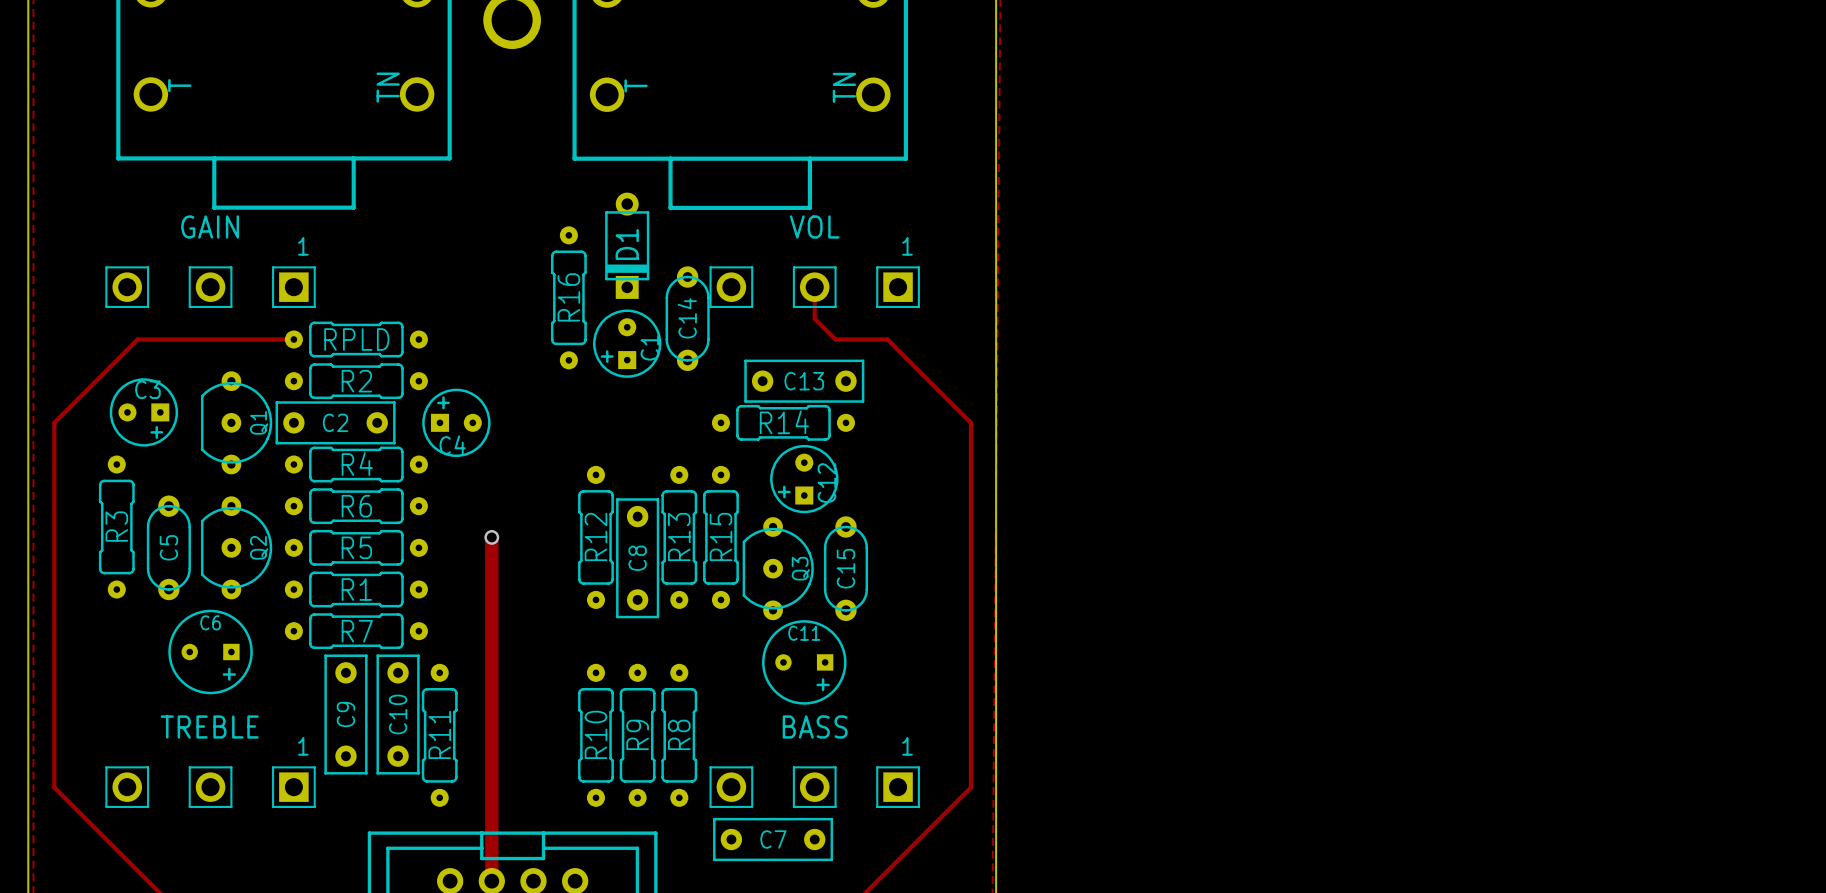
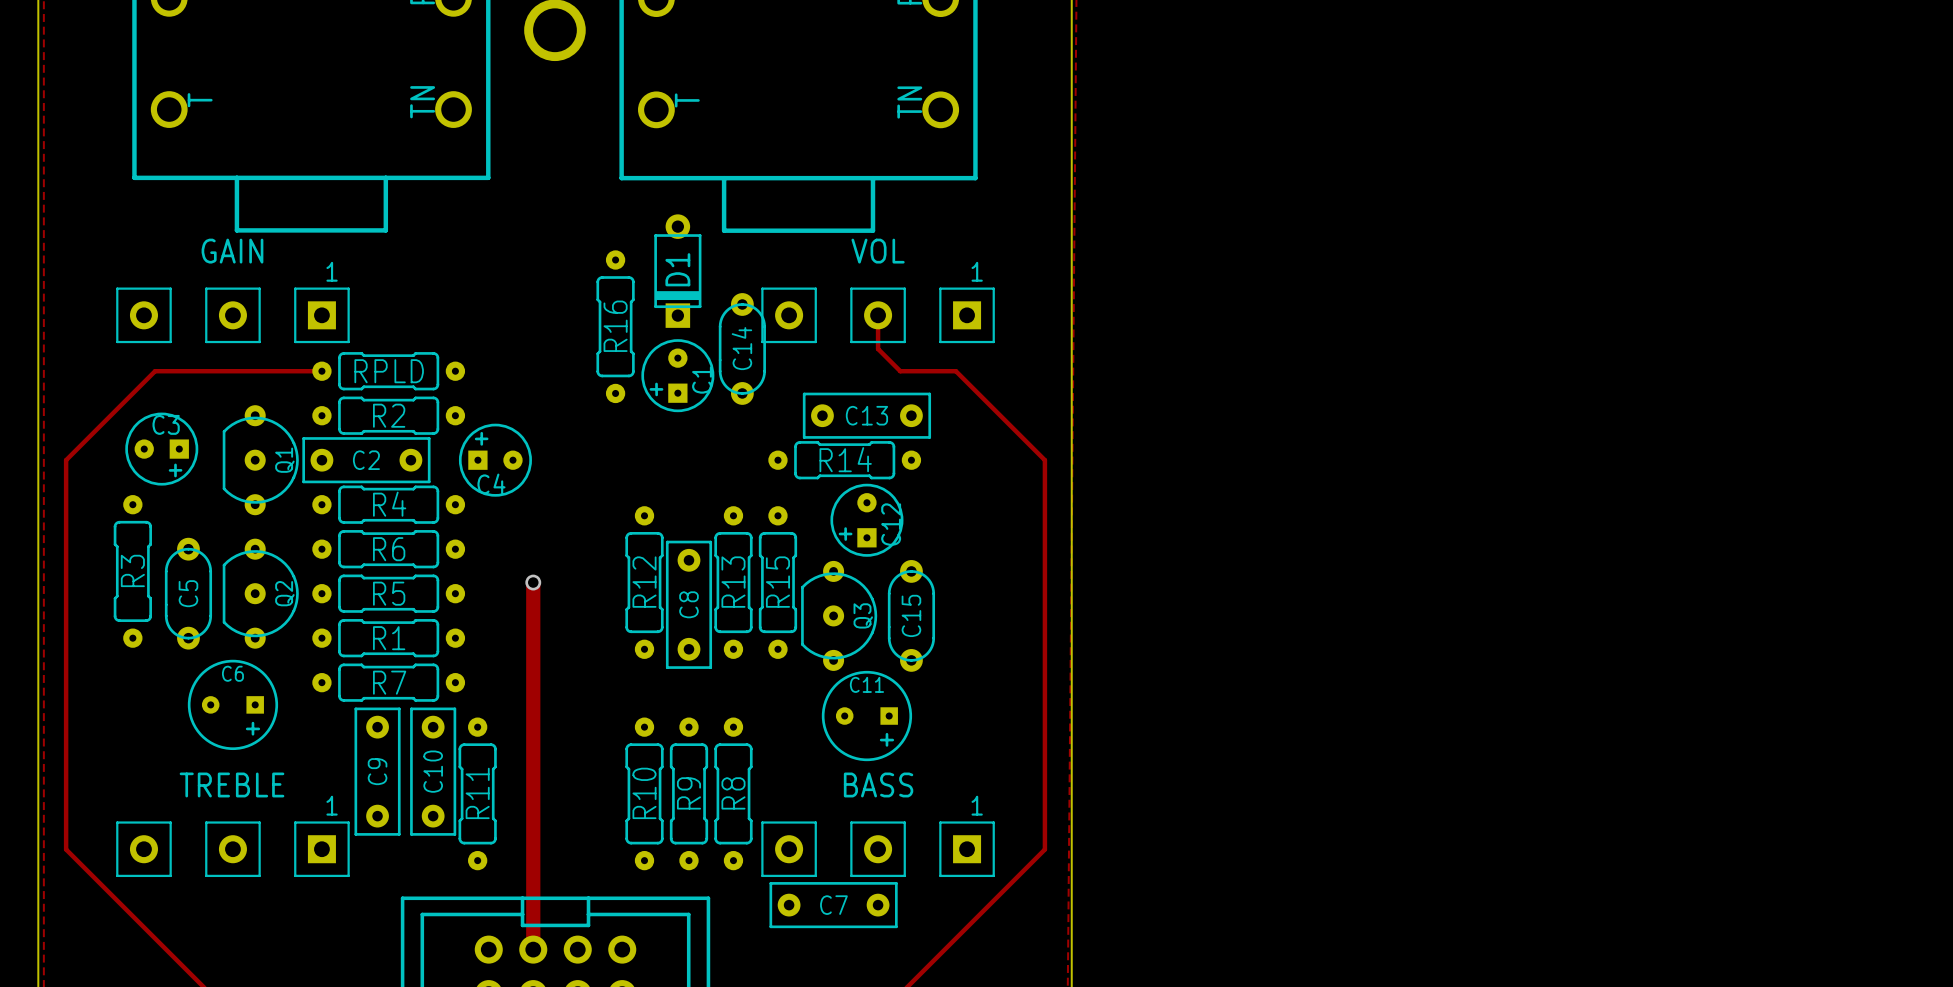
GAIN footprint: [105, 266, 316, 308] -> [116, 287, 350, 344]
VOL footprint: [709, 266, 920, 308] -> [761, 287, 995, 344]
TREBLE footprint: [105, 766, 316, 808] -> [116, 821, 350, 878]
BASS footprint: [709, 766, 920, 808] -> [761, 821, 995, 878]

